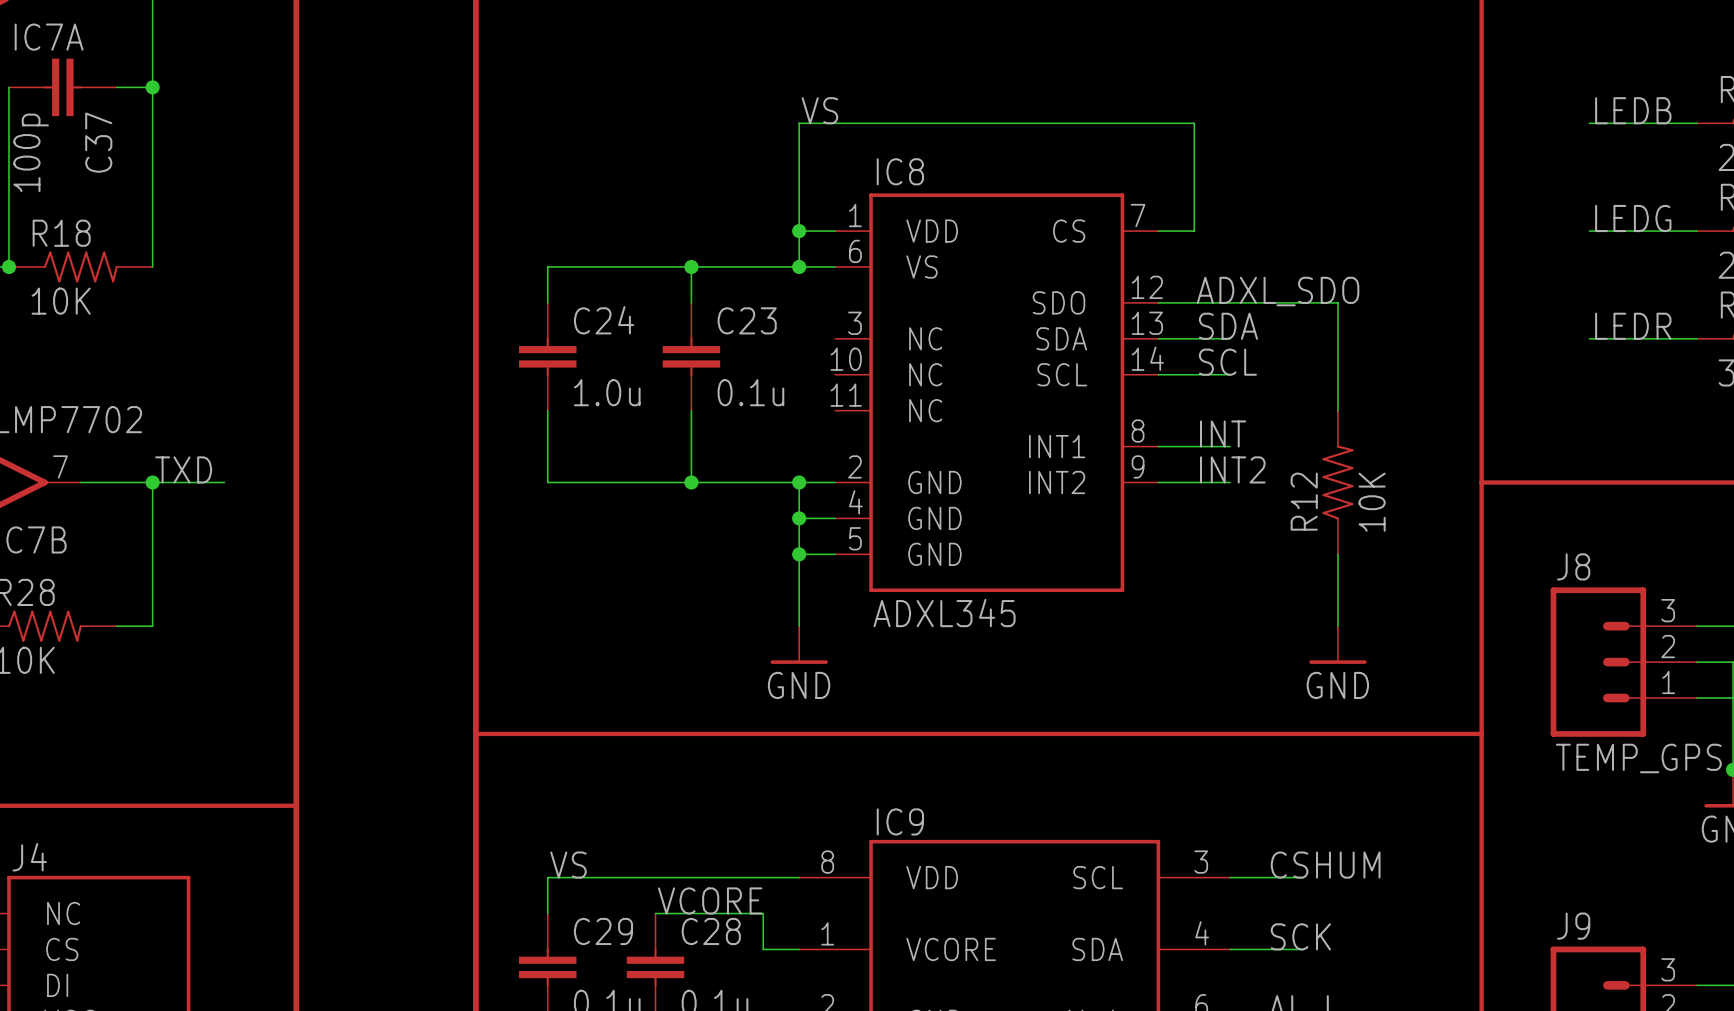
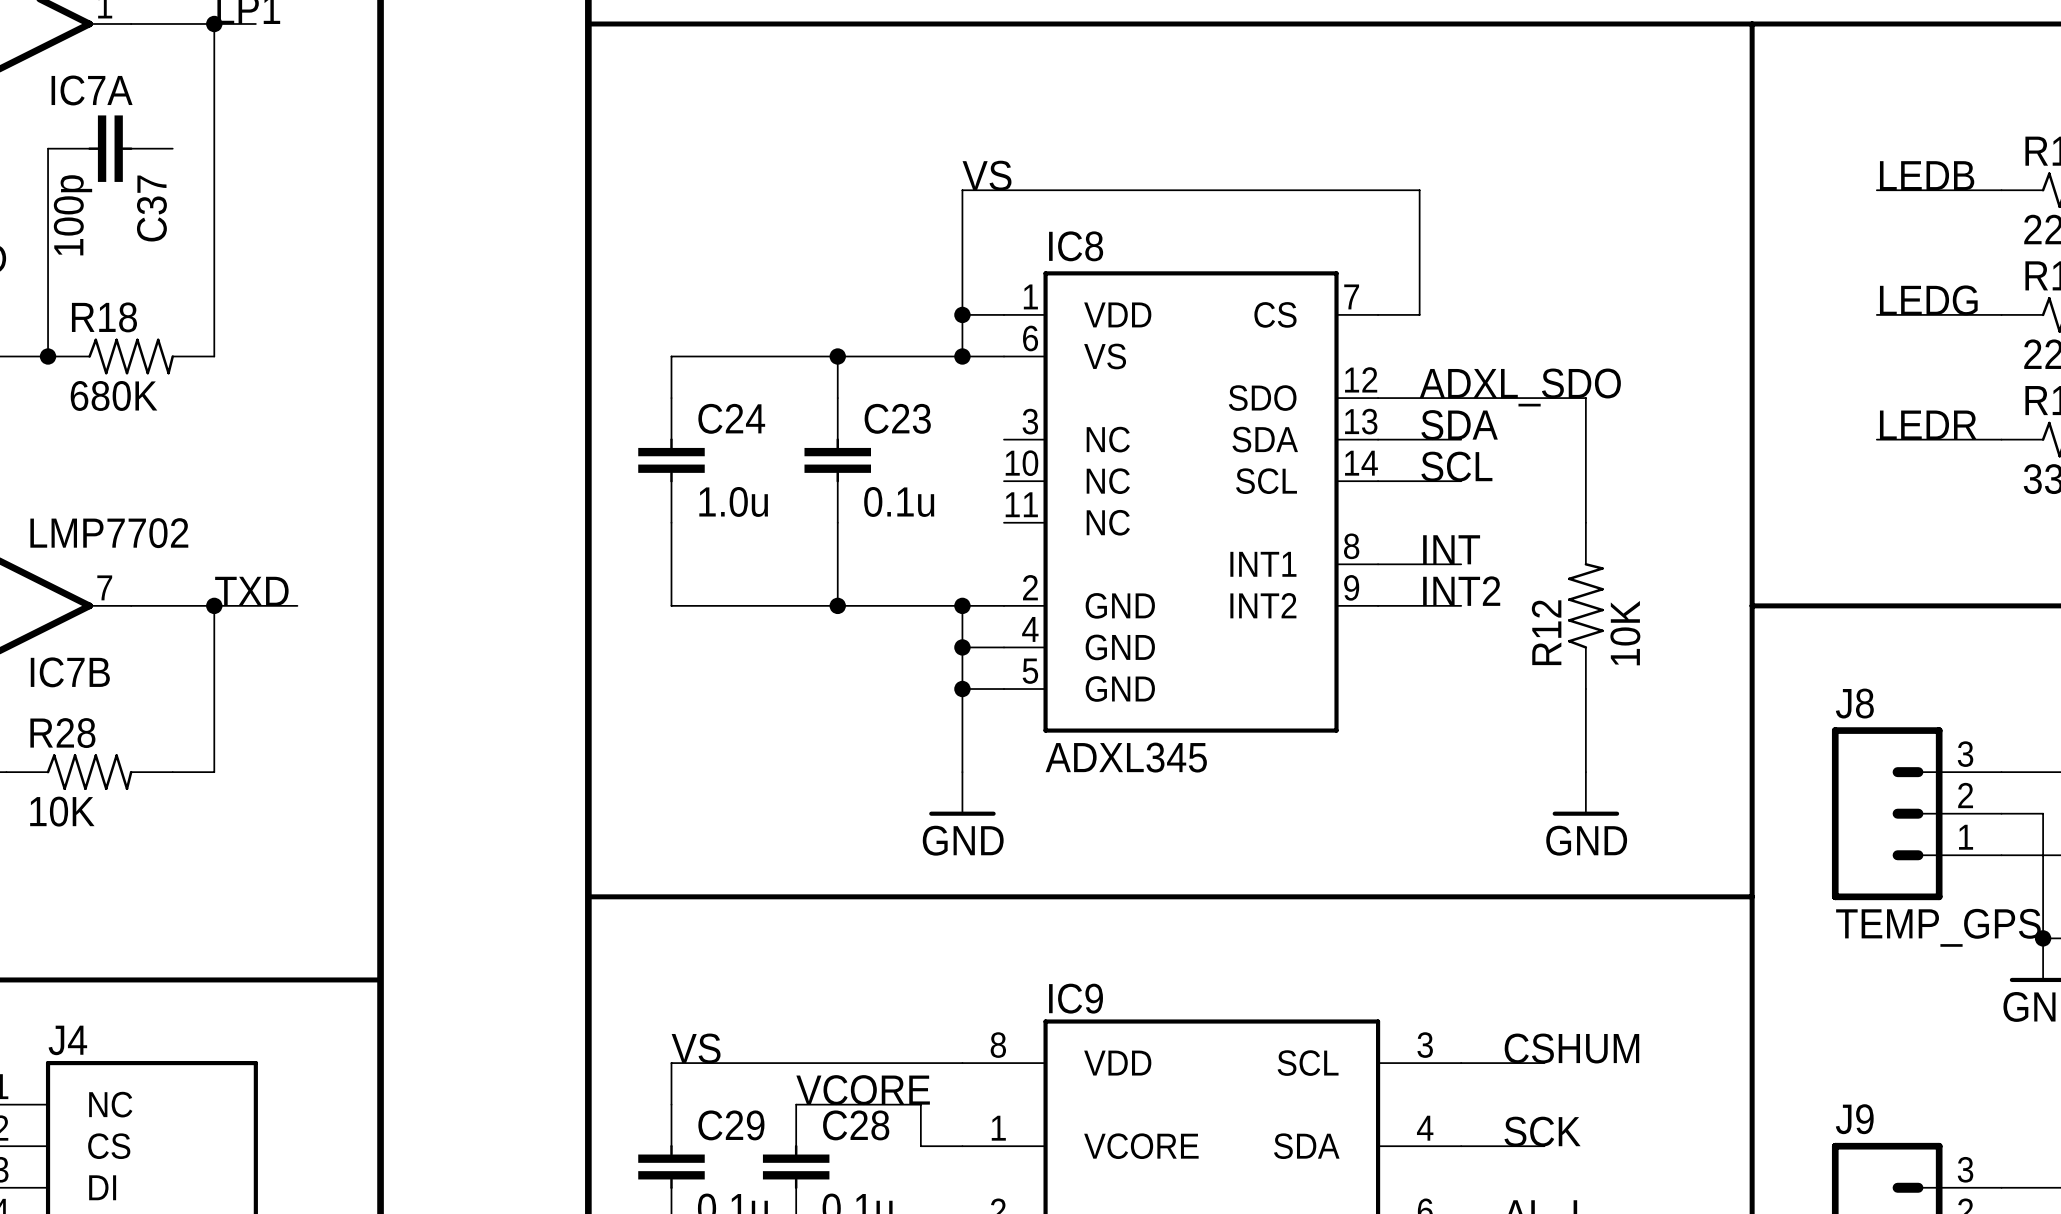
wire: (116, 87) (152, 87) -> none
junction: (152, 87) -> none
R18 value: 10K (61, 301) -> 680K (114, 395)

